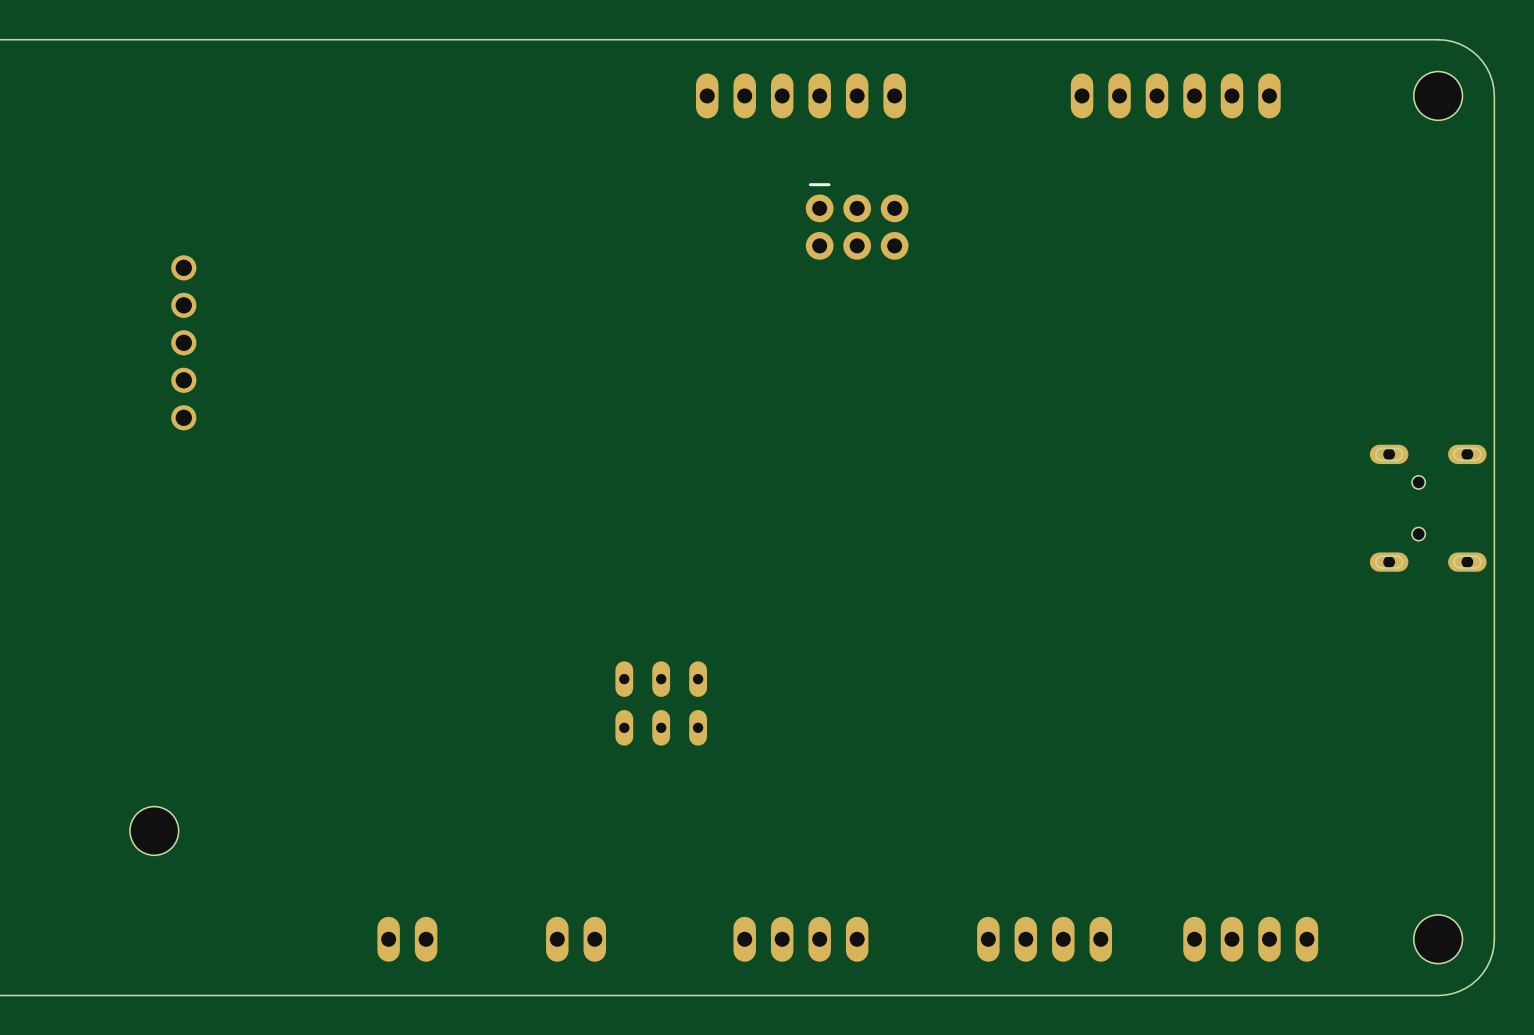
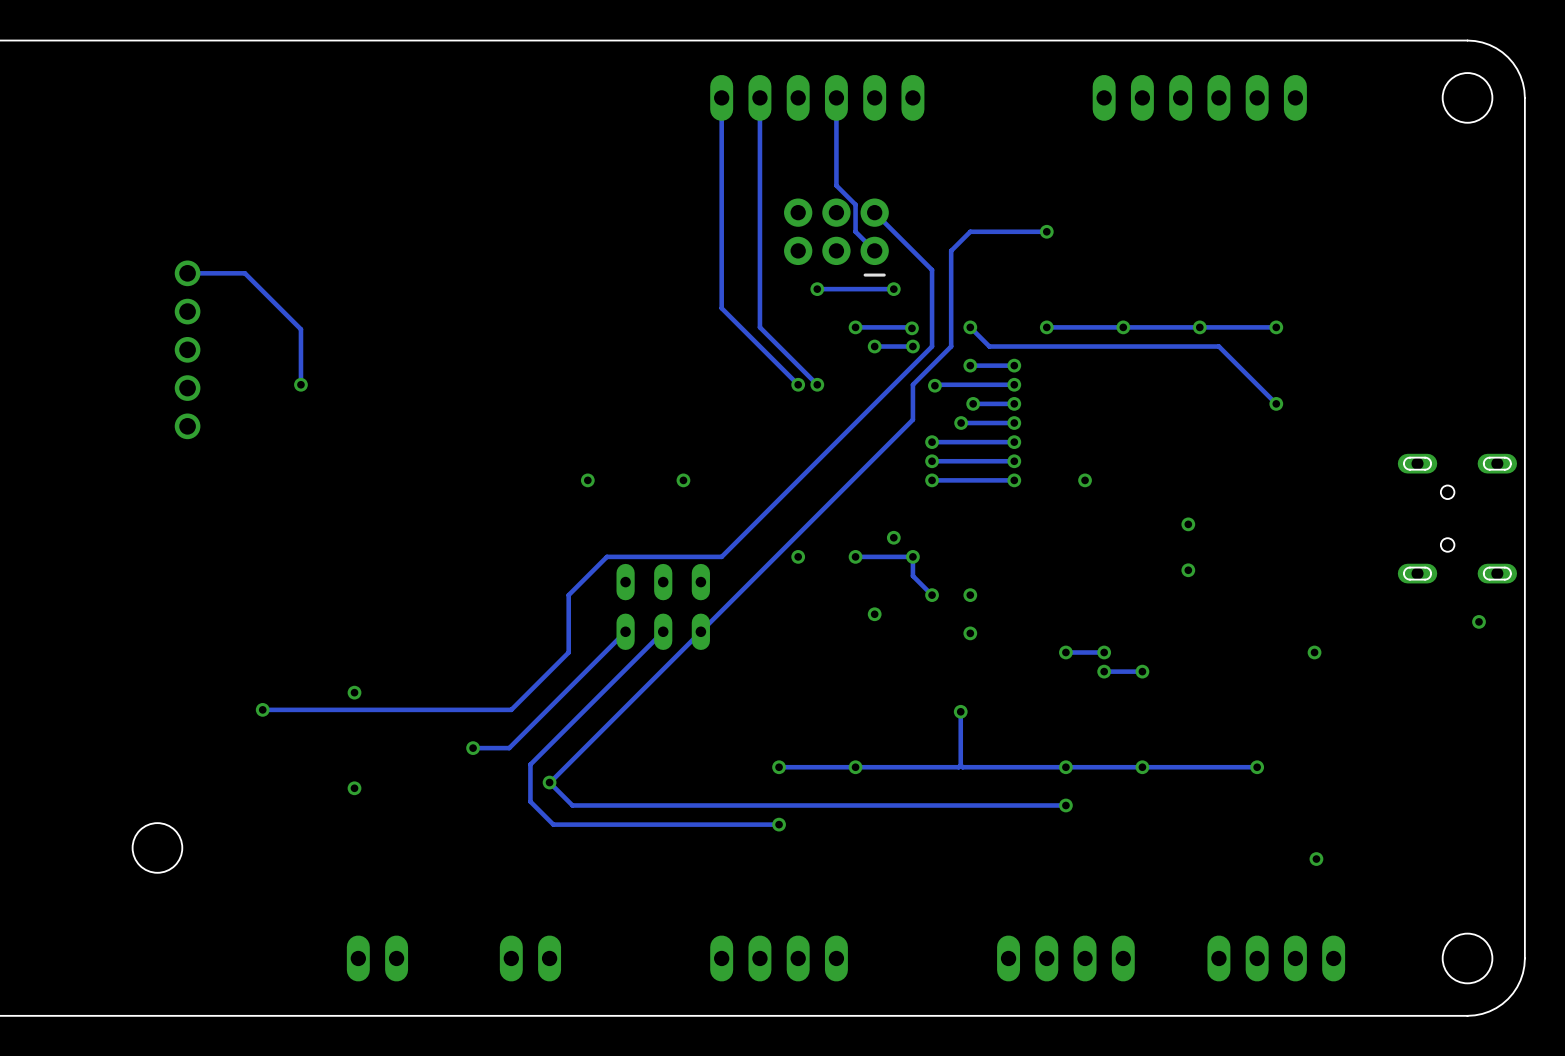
track: none -> (721, 97) (721, 308) (798, 384)
track: none -> (759, 97) (759, 327) (817, 384)
track: none -> (836, 97) (836, 185) (855, 204) (855, 231) (874, 250)
track: none -> (874, 212) (932, 270) (932, 346) (721, 556) (606, 556) (568, 595) (568, 652) (511, 709) (262, 709)
part rotation: 0° (857, 221) -> 180° (836, 237)
track: none -> (1046, 231) (970, 231) (951, 250) (951, 346) (912, 384) (912, 419) (549, 782) (572, 805) (1065, 805)
via: none -> (1046, 231)
track: none -> (187, 273) (244, 273) (300, 329) (300, 384)
via: none -> (817, 289)
track: none -> (893, 289) (817, 289)
via: none -> (893, 289)
track: none -> (855, 327) (911, 328)
via: none -> (855, 327)
track: none -> (970, 327) (989, 346) (1218, 346) (1276, 403)
via: none -> (970, 327)
via: none -> (1046, 327)
via: none -> (1123, 327)
via: none -> (1199, 327)
track: none -> (1276, 327) (1046, 327)
via: none -> (1276, 327)
via: none -> (911, 328)
via: none -> (874, 346)
track: none -> (912, 346) (874, 346)
via: none -> (912, 346)
via: none -> (970, 365)
track: none -> (1014, 365) (970, 365)
via: none -> (1014, 365)
via: none -> (300, 384)
via: none -> (798, 384)
via: none -> (817, 384)
via: none -> (934, 385)
track: none -> (1014, 384) (934, 385)
via: none -> (1014, 384)
via: none -> (973, 403)
track: none -> (1014, 403) (973, 403)
via: none -> (1014, 403)
via: none -> (1276, 403)
via: none -> (961, 423)
track: none -> (1014, 423) (961, 423)
via: none -> (1014, 423)
via: none -> (932, 442)
track: none -> (1014, 442) (932, 442)
via: none -> (1014, 442)
via: none -> (932, 461)
track: none -> (1014, 461) (932, 461)
via: none -> (1014, 461)
via: none -> (587, 480)
via: none -> (683, 480)
via: none -> (932, 480)
track: none -> (1014, 480) (932, 480)
via: none -> (1014, 480)
via: none -> (1085, 480)
via: none -> (1188, 524)
via: none -> (893, 537)
via: none -> (798, 556)
track: none -> (855, 556) (912, 556) (912, 576) (932, 595)
via: none -> (855, 556)
via: none -> (912, 556)
via: none -> (1188, 570)
via: none -> (932, 595)
via: none -> (970, 595)
via: none -> (874, 614)
via: none -> (1479, 621)
track: none -> (625, 631) (509, 748) (473, 748)
track: none -> (663, 631) (530, 764) (530, 801) (553, 824) (779, 824)
via: none -> (970, 633)
via: none -> (1065, 652)
track: none -> (1104, 652) (1065, 652)
via: none -> (1104, 652)
via: none -> (1314, 652)
via: none -> (1104, 671)
track: none -> (1142, 671) (1104, 671)
via: none -> (1142, 671)
via: none -> (354, 692)
via: none -> (262, 709)
track: none -> (960, 711) (960, 765)
via: none -> (960, 711)
part position: (661, 703) -> (663, 606)
via: none -> (473, 748)
track: none -> (960, 765) (958, 767) (779, 767)
track: none -> (960, 765) (962, 767) (1257, 767)
via: none -> (779, 767)
via: none -> (855, 767)
via: none -> (1065, 767)
via: none -> (1142, 767)
via: none -> (1257, 767)
via: none -> (549, 782)
via: none -> (354, 788)
via: none -> (1065, 805)
via: none -> (779, 824)
via: none -> (1316, 859)
part position: (407, 939) -> (377, 958)
part: none -> (530, 958)
part: (576, 939) -> none
part position: (800, 939) -> (779, 958)

